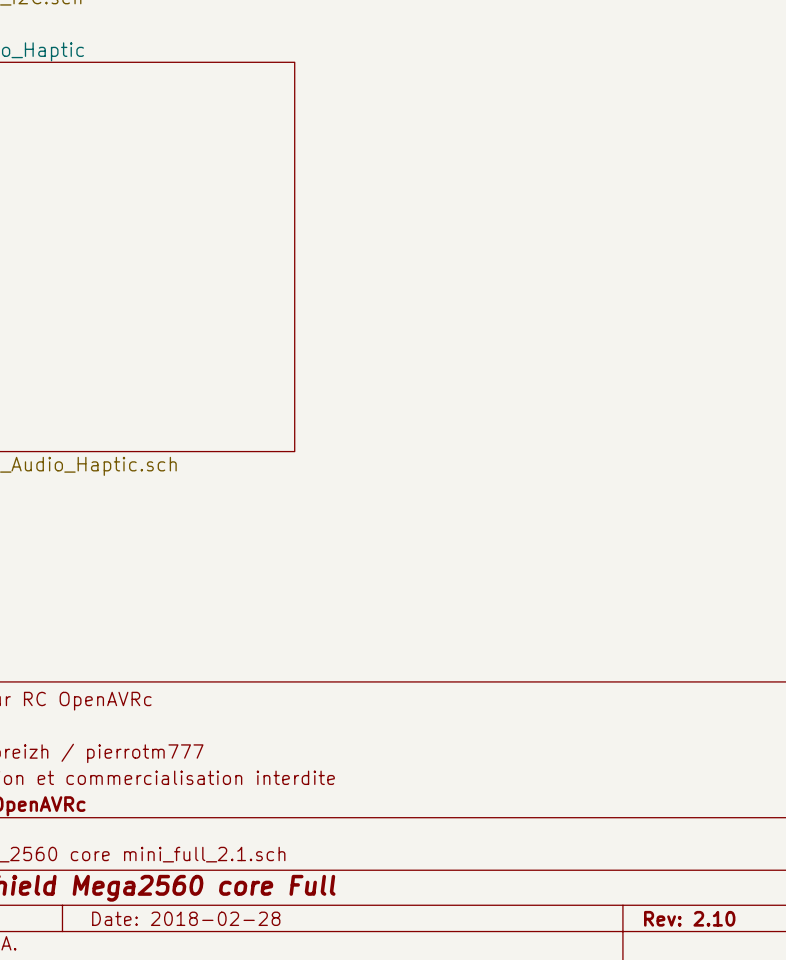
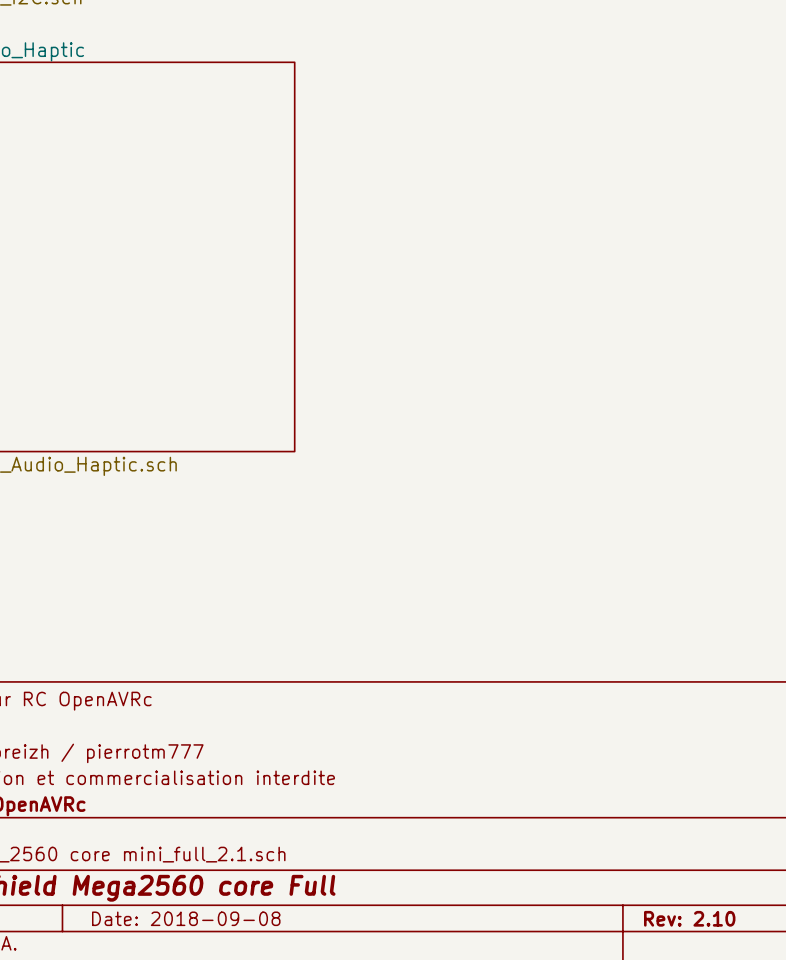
title block: Date: 2018-02-28 (186, 918) -> Date: 2018-09-08 (186, 918)

